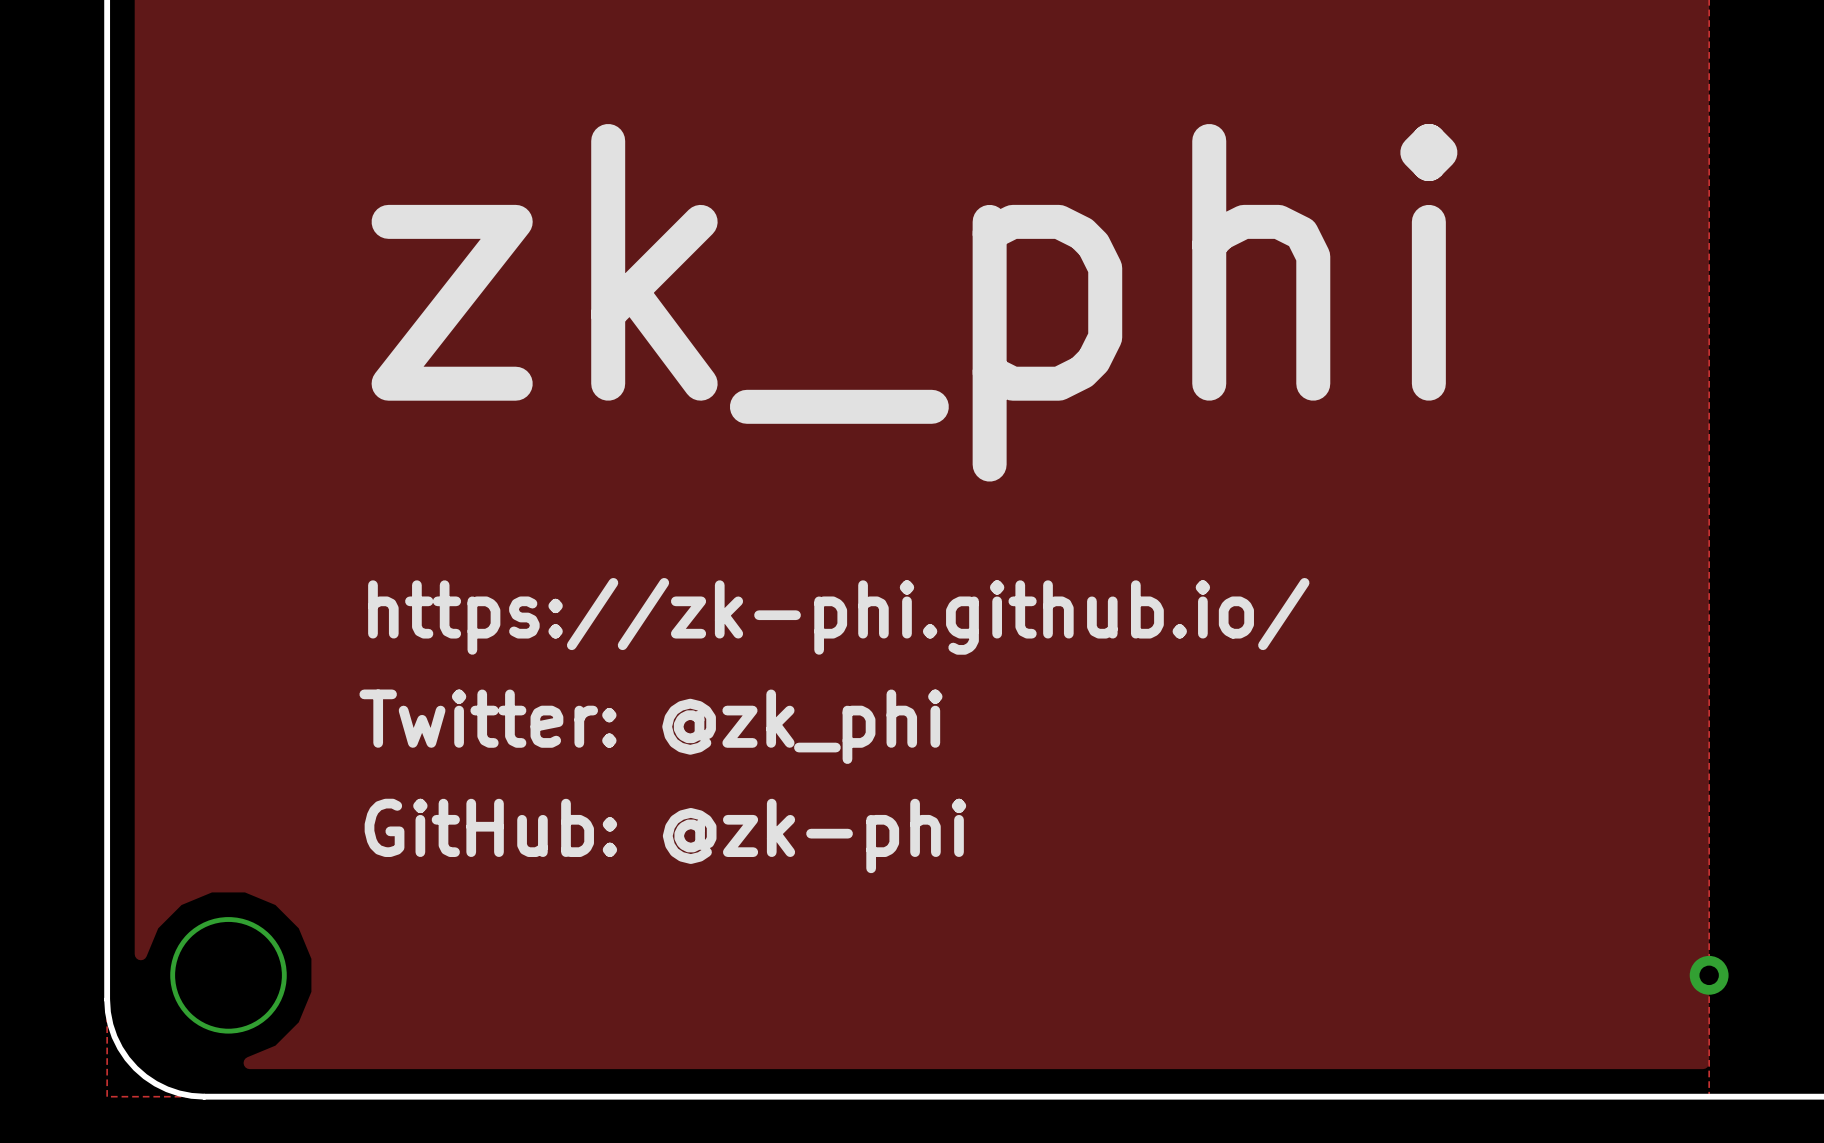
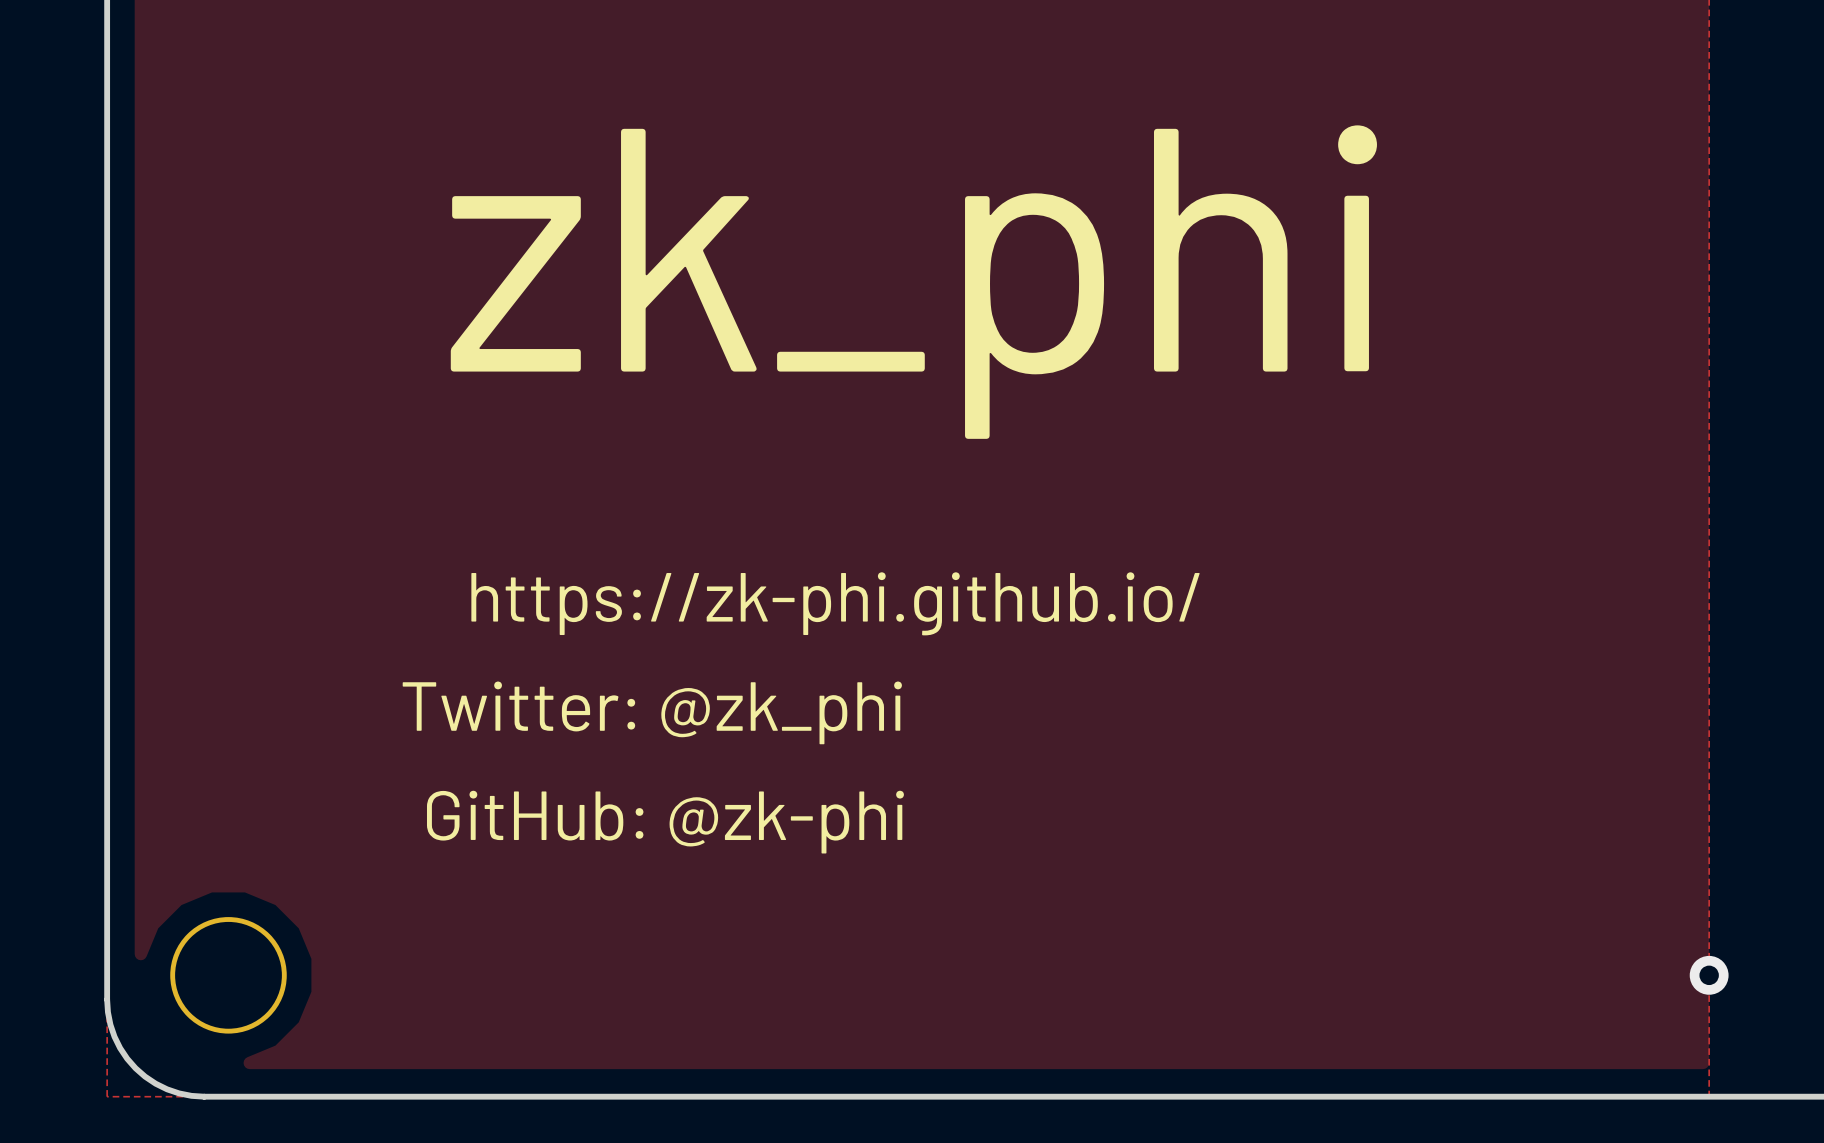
text position: zk_phi (914, 302) -> zk_phi (913, 282)
text position: https://zk-phi.github.io/ (838, 616) -> https://zk-phi.github.io/ (835, 603)
text position: Twitter: @zk_phi (650, 726) -> Twitter: @zk_phi (652, 712)
text position: GitHub: @zk-phi (665, 835) -> GitHub: @zk-phi (665, 822)

